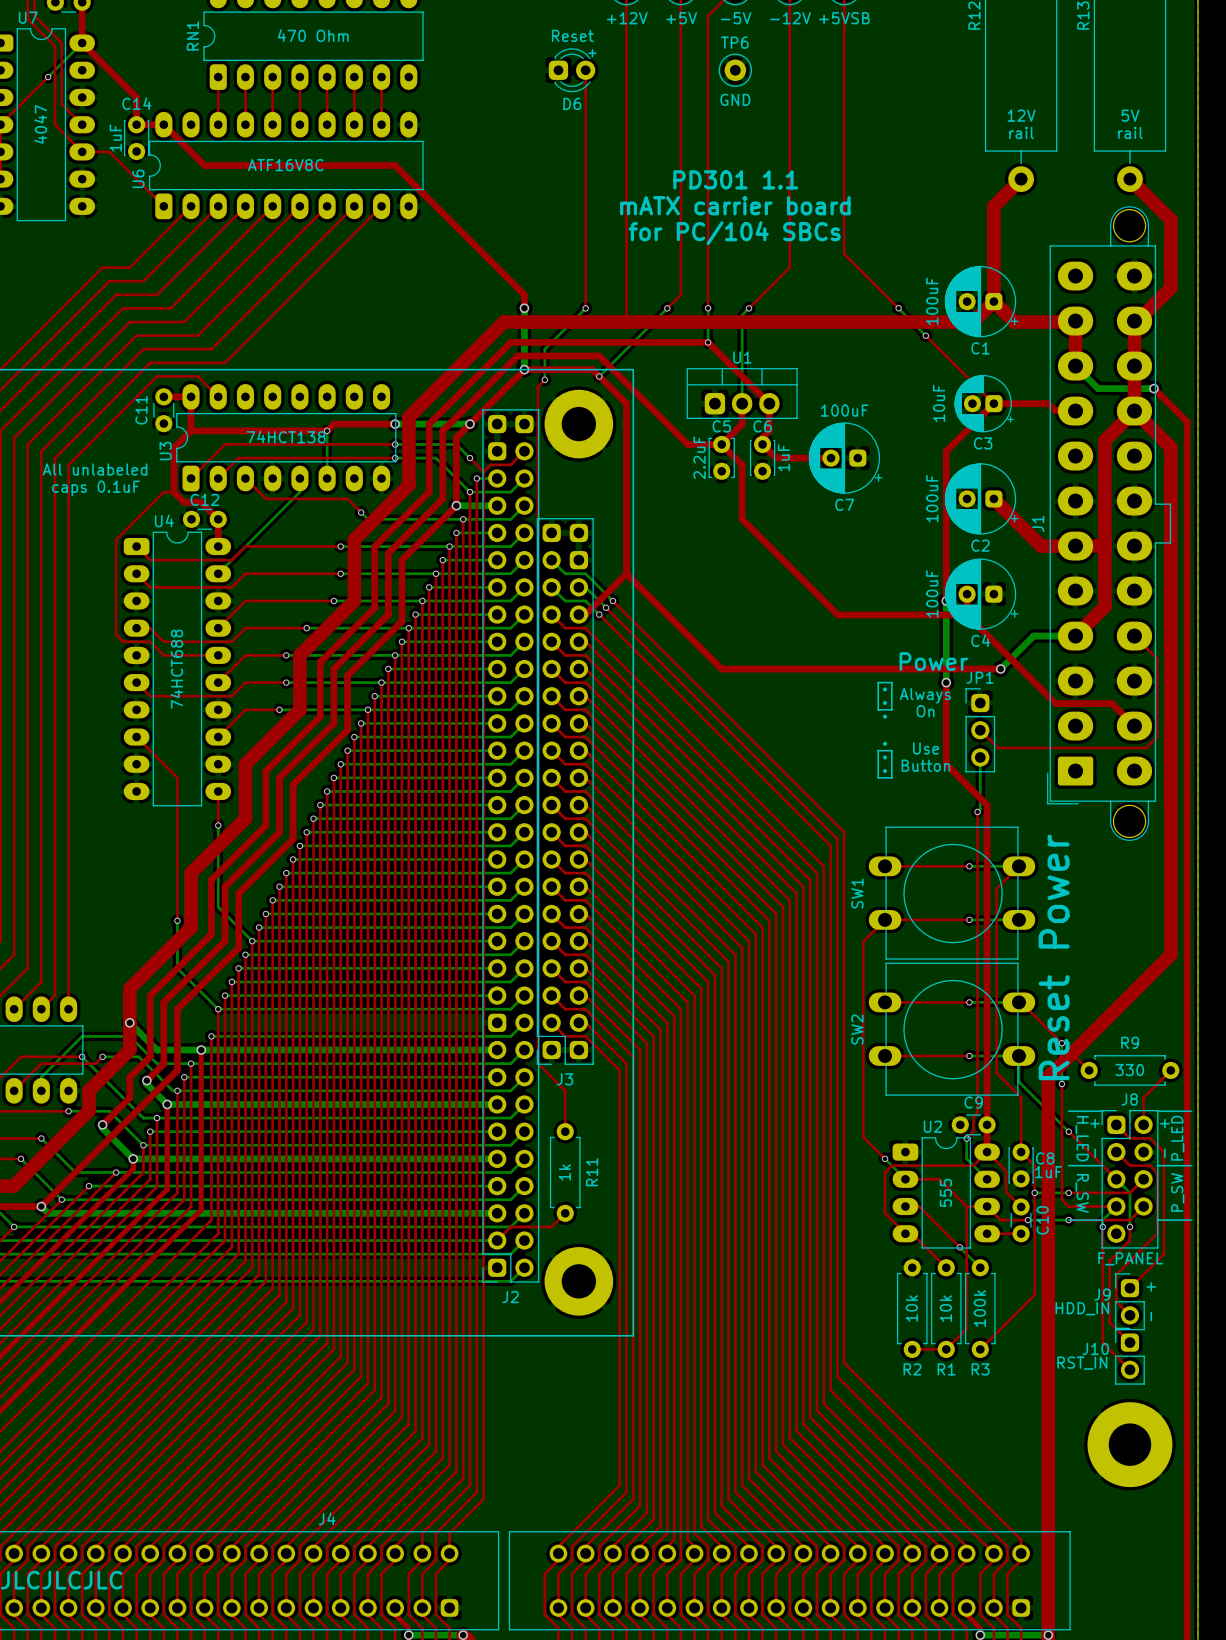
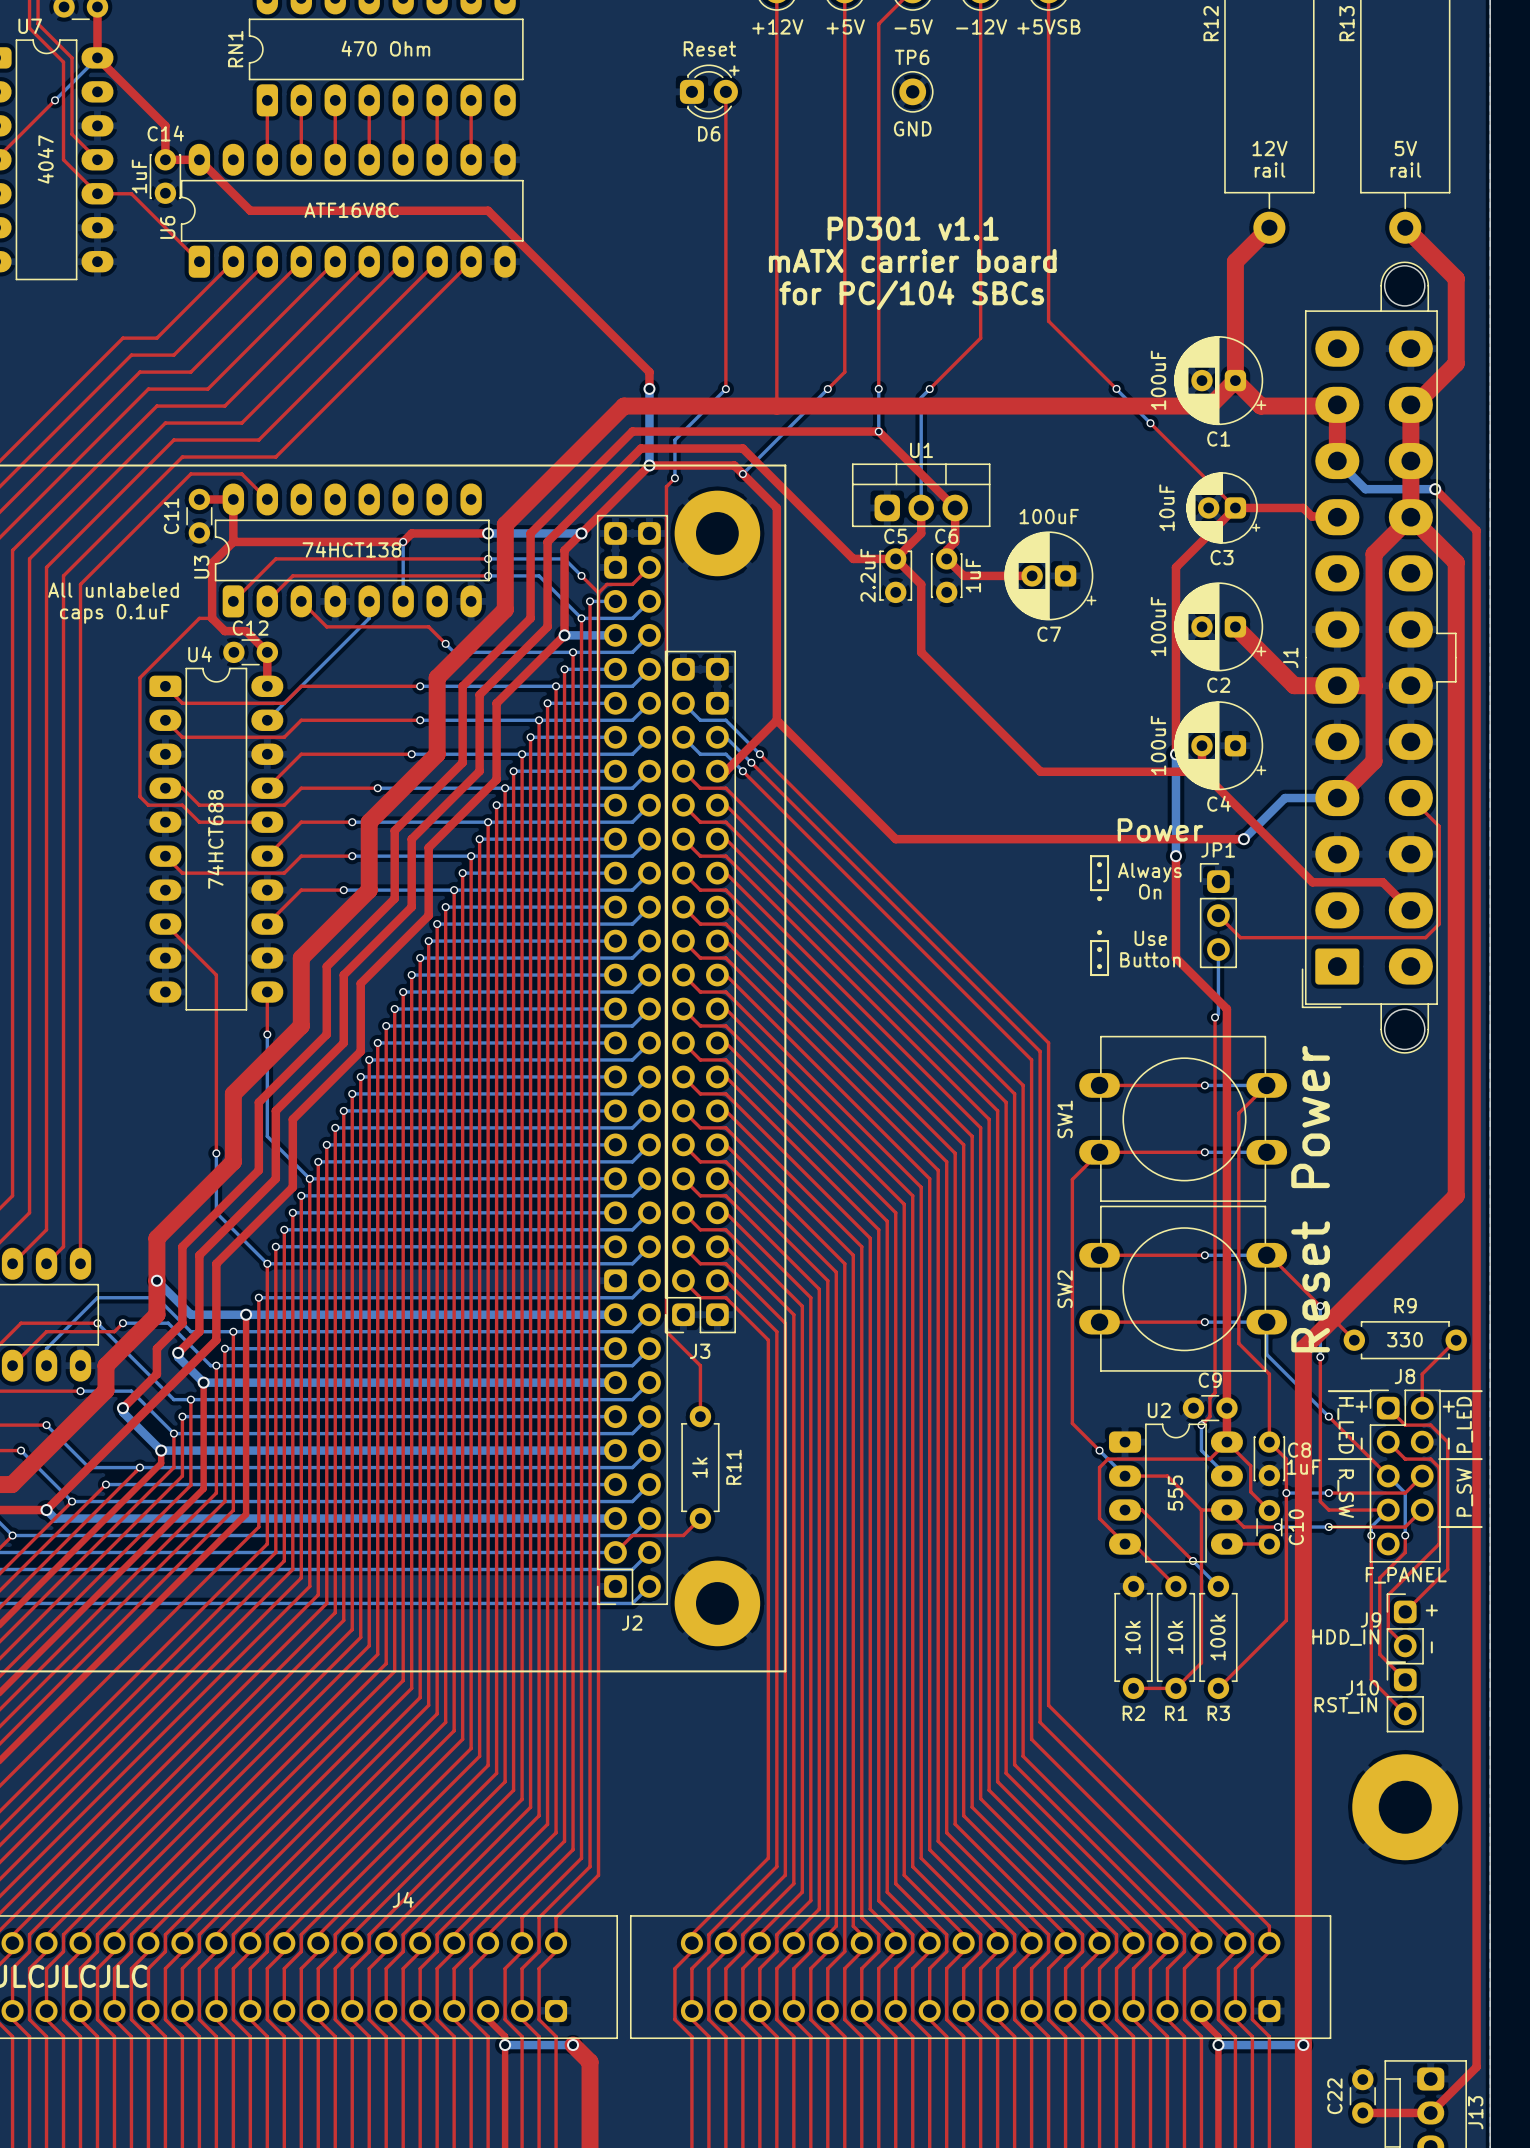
text: PD301 1.1 (735, 179) -> PD301 v1.1 (913, 228)

